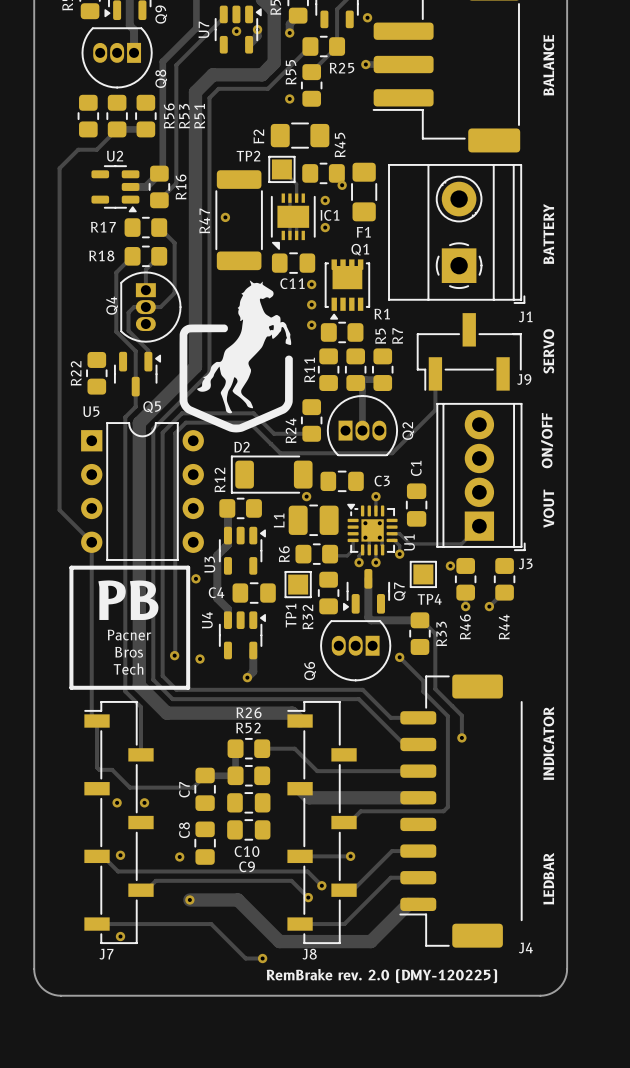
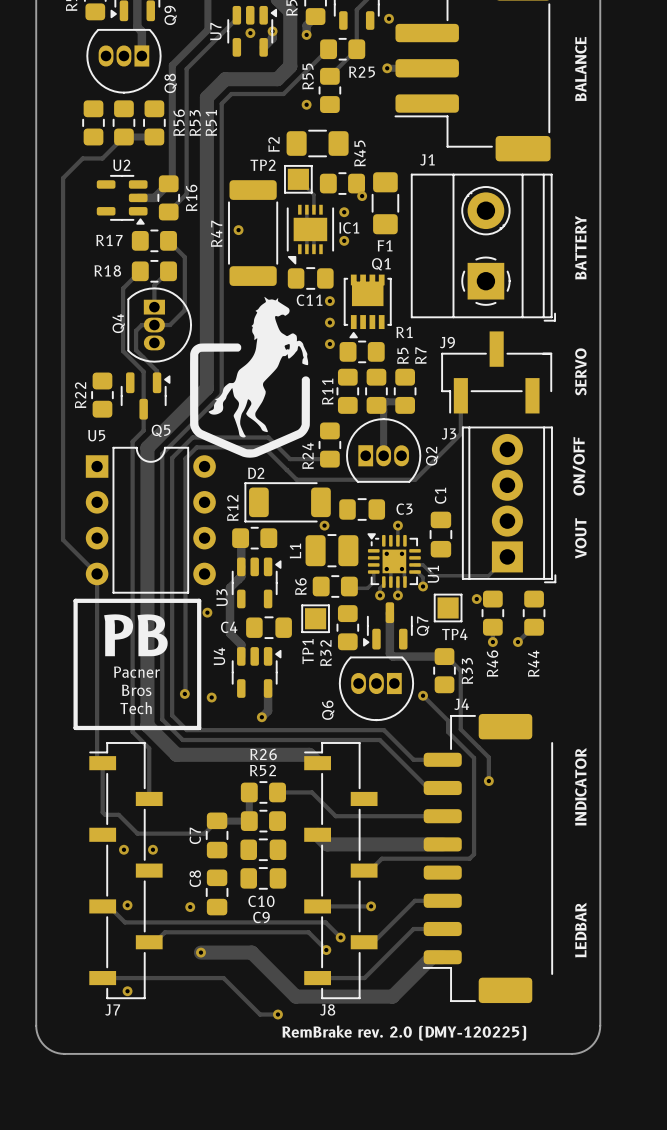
J1 name position: J1 (525, 316) -> J1 (427, 159)
J9 name position: J9 (524, 379) -> J9 (447, 342)
J3 name position: J3 (525, 563) -> J3 (449, 433)
J4 name position: J4 (525, 948) -> J4 (461, 704)

